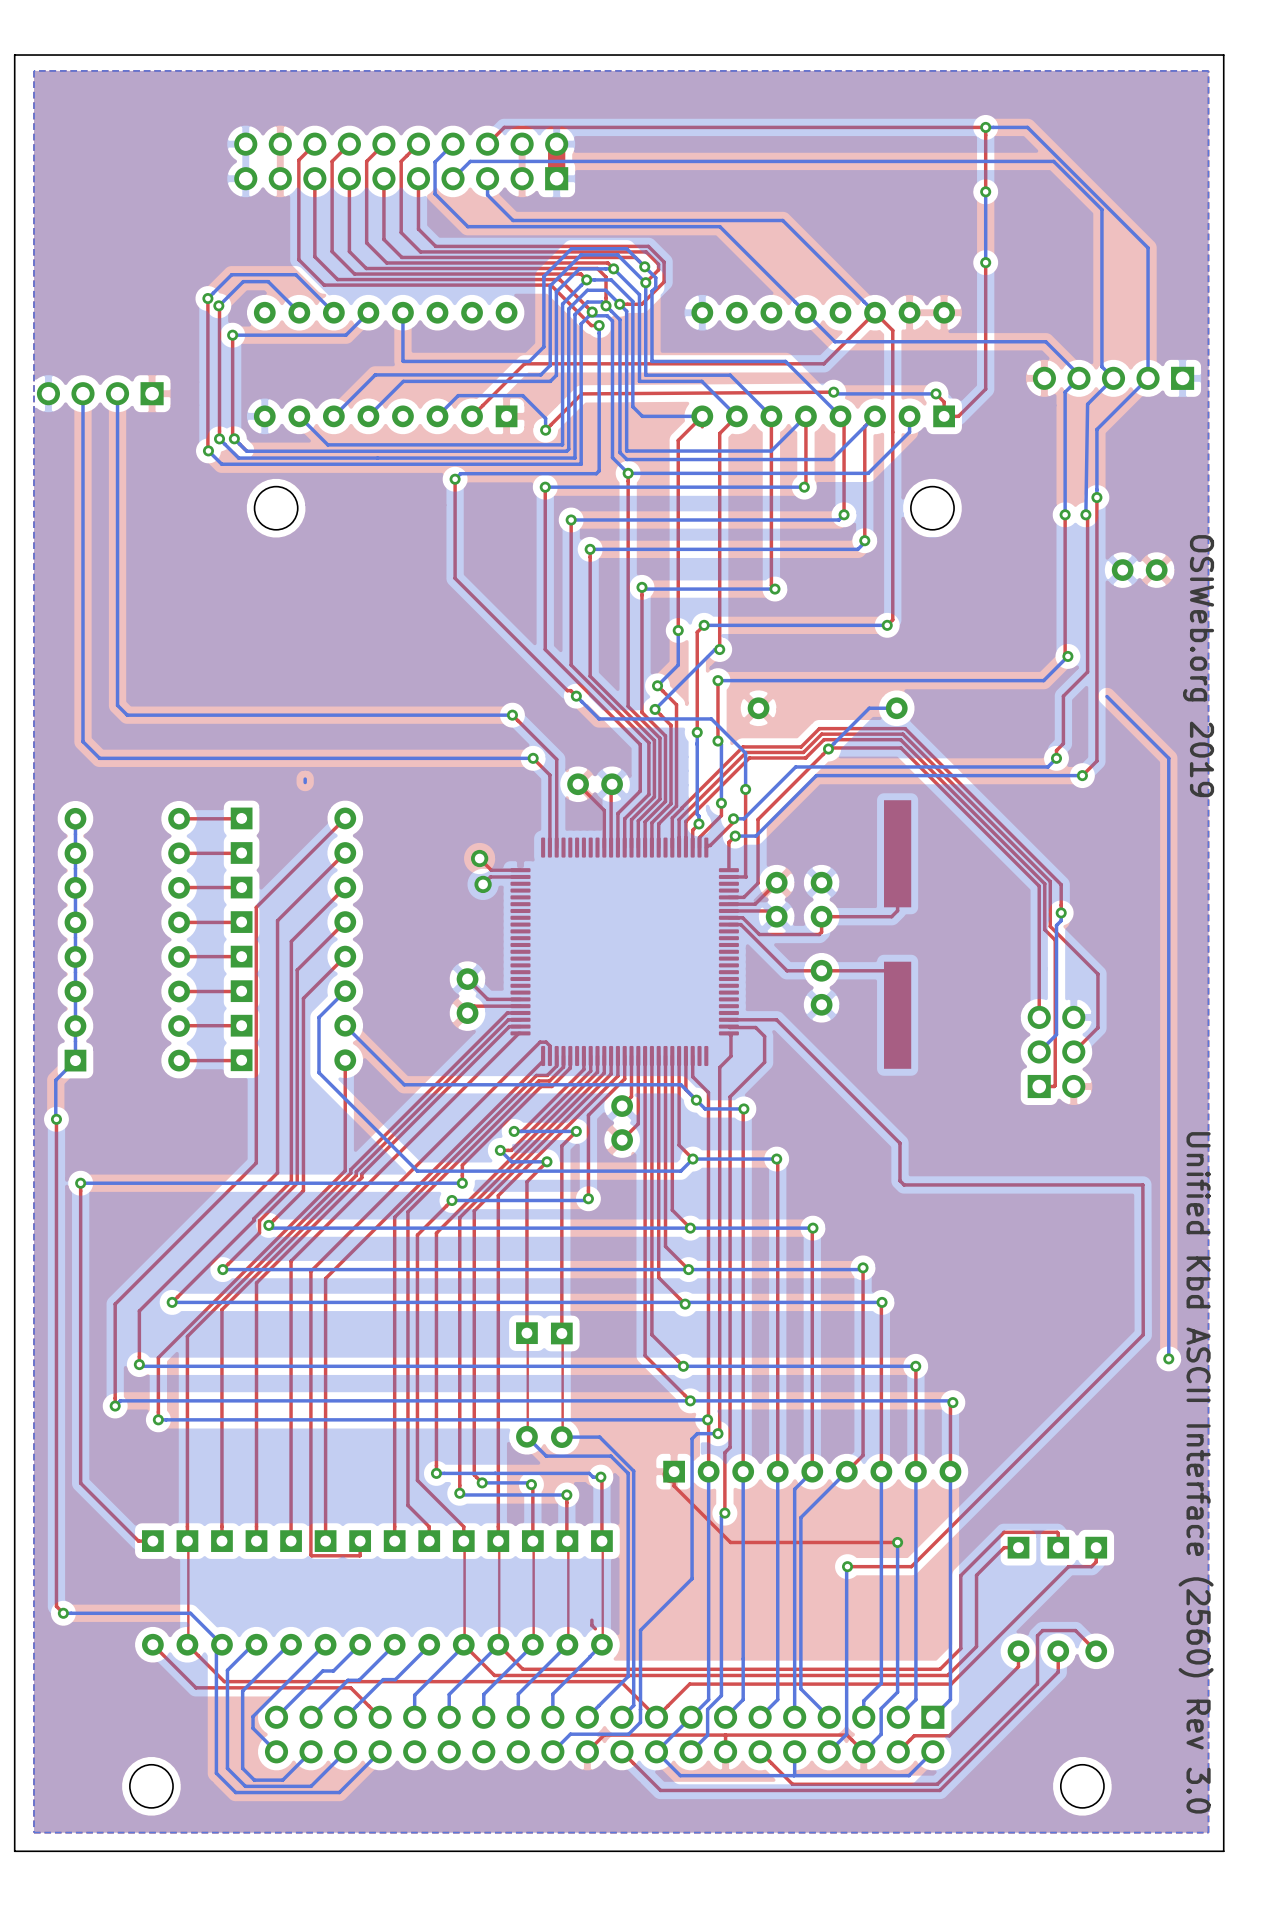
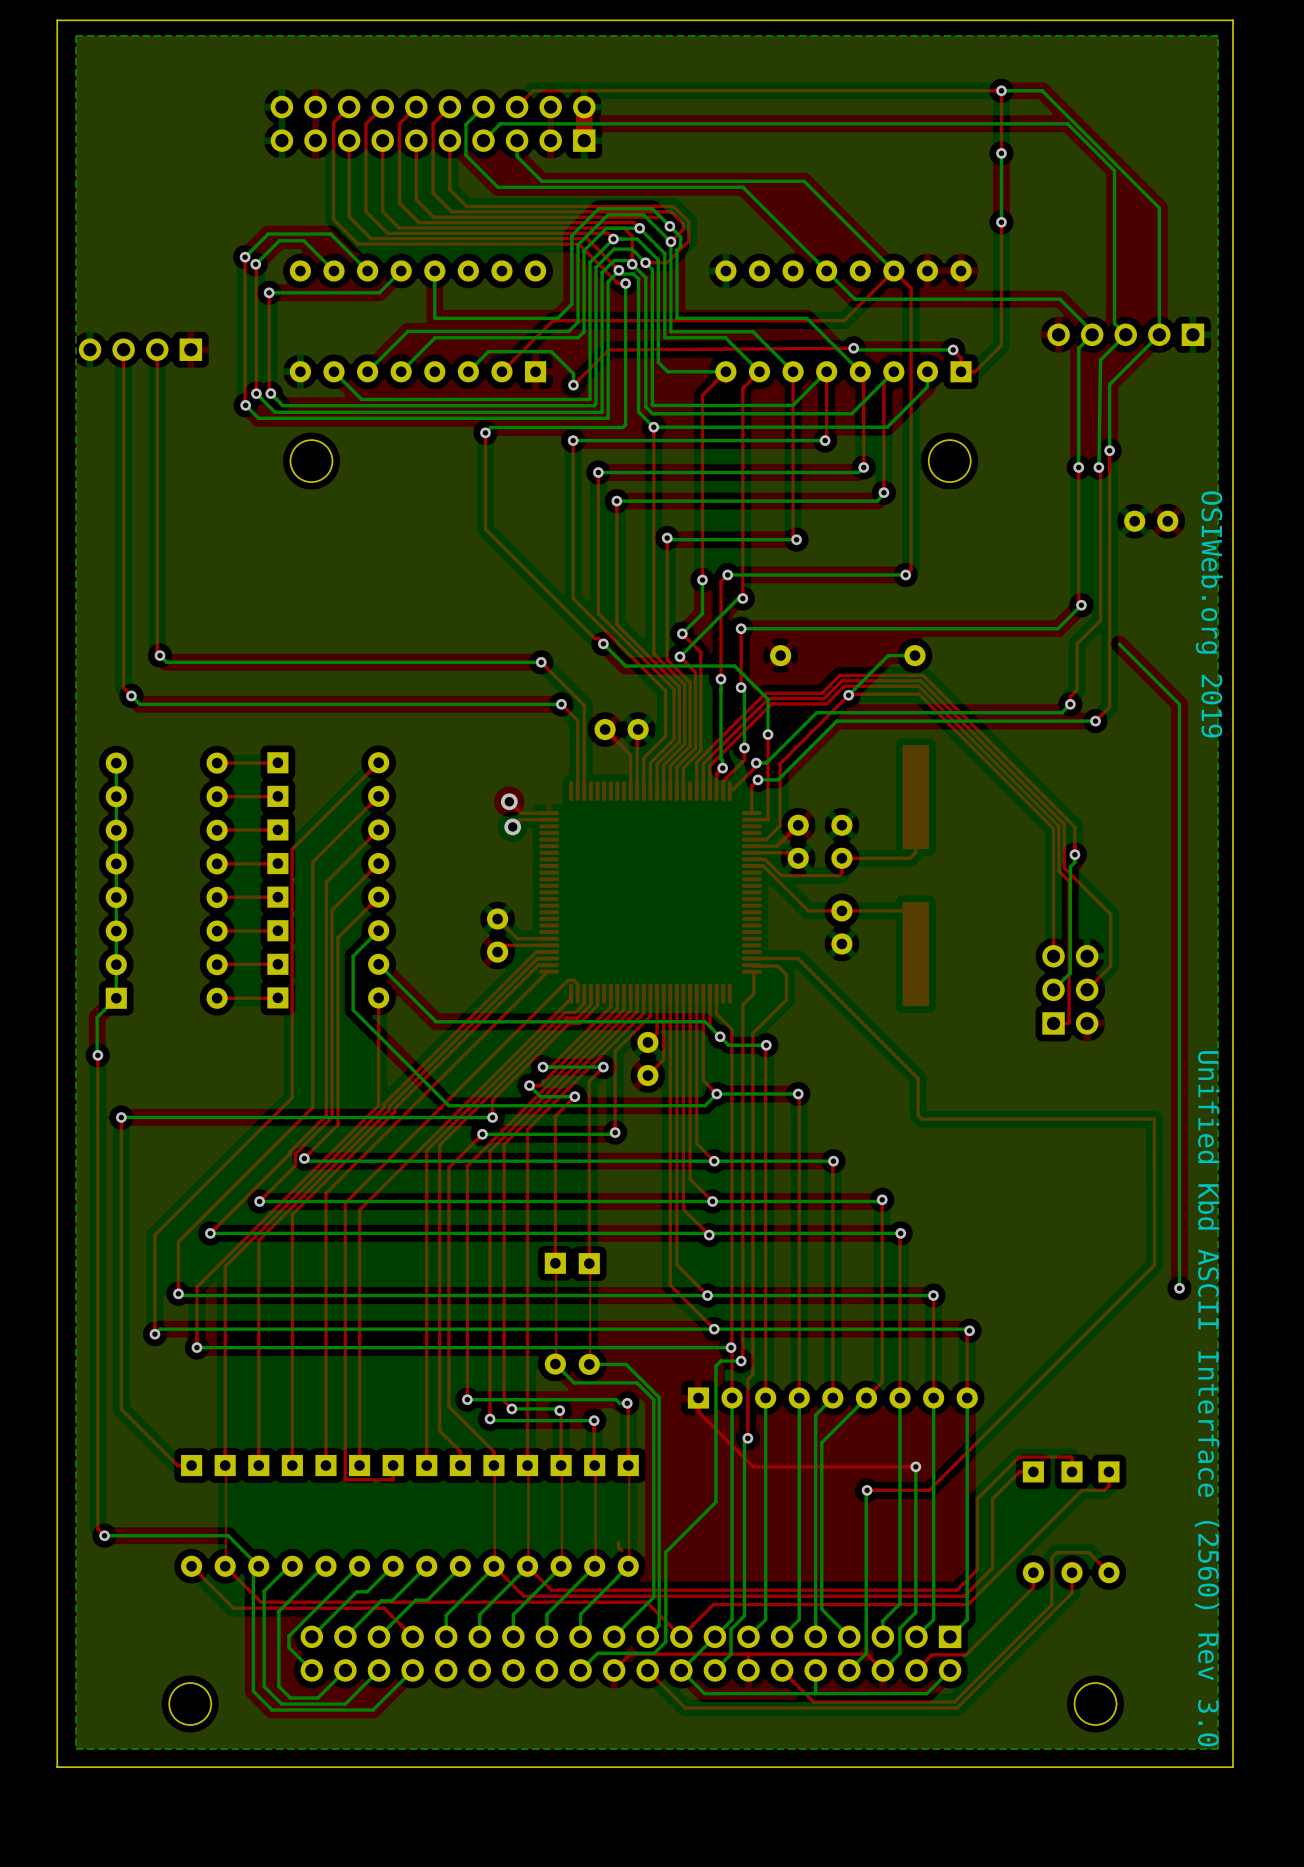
top track: none -> (123, 349) (123, 688) (131, 695)
bottom track: (83, 393) (83, 741) (91, 749) -> none
top track: none -> (157, 349) (157, 652) (159, 655)
bottom track: (117, 393) (117, 705) (120, 708) -> none
via: none -> (159, 655)
via: none -> (131, 695)
bottom track: (305, 779) (305, 782) -> none

